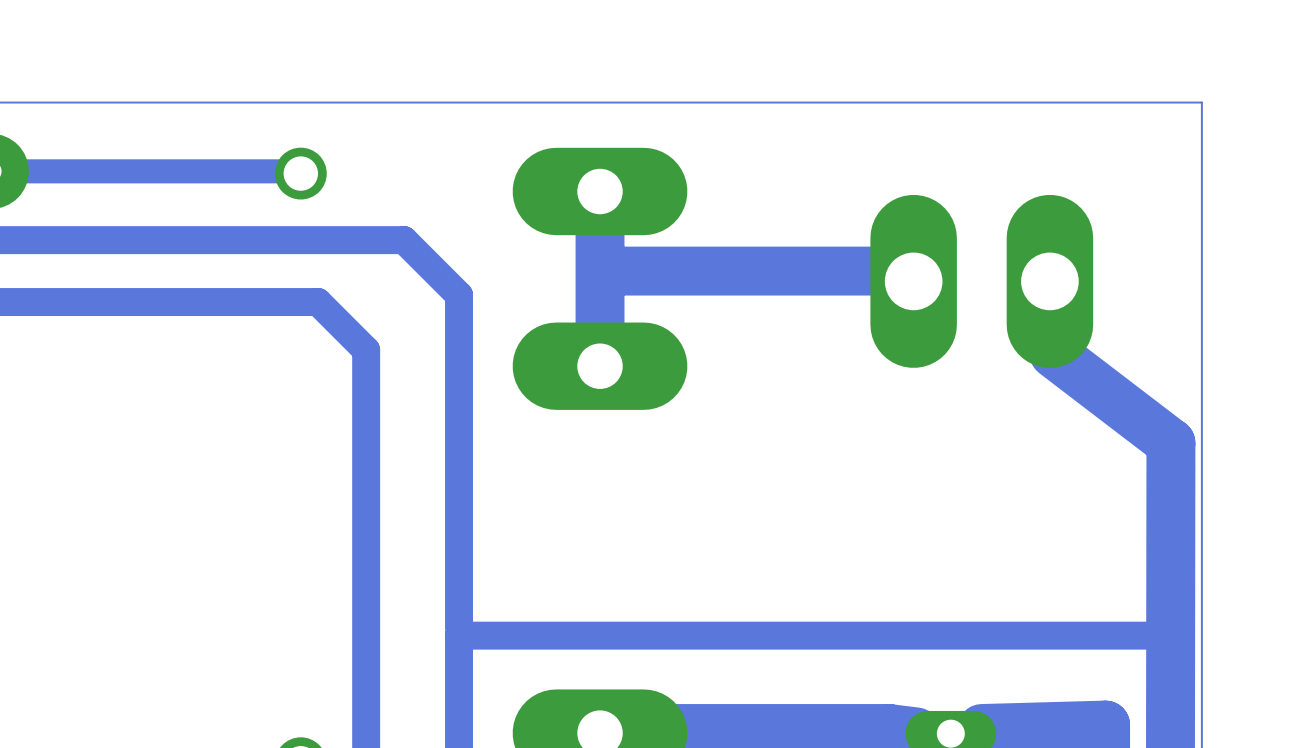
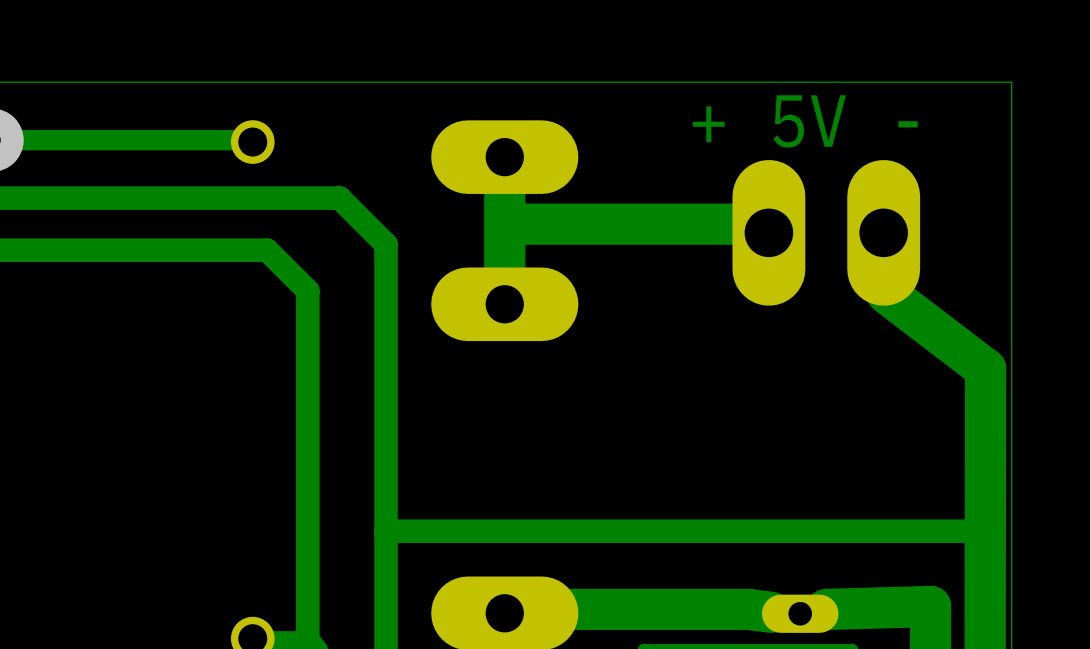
text: none -> + 5V - (805, 121)

